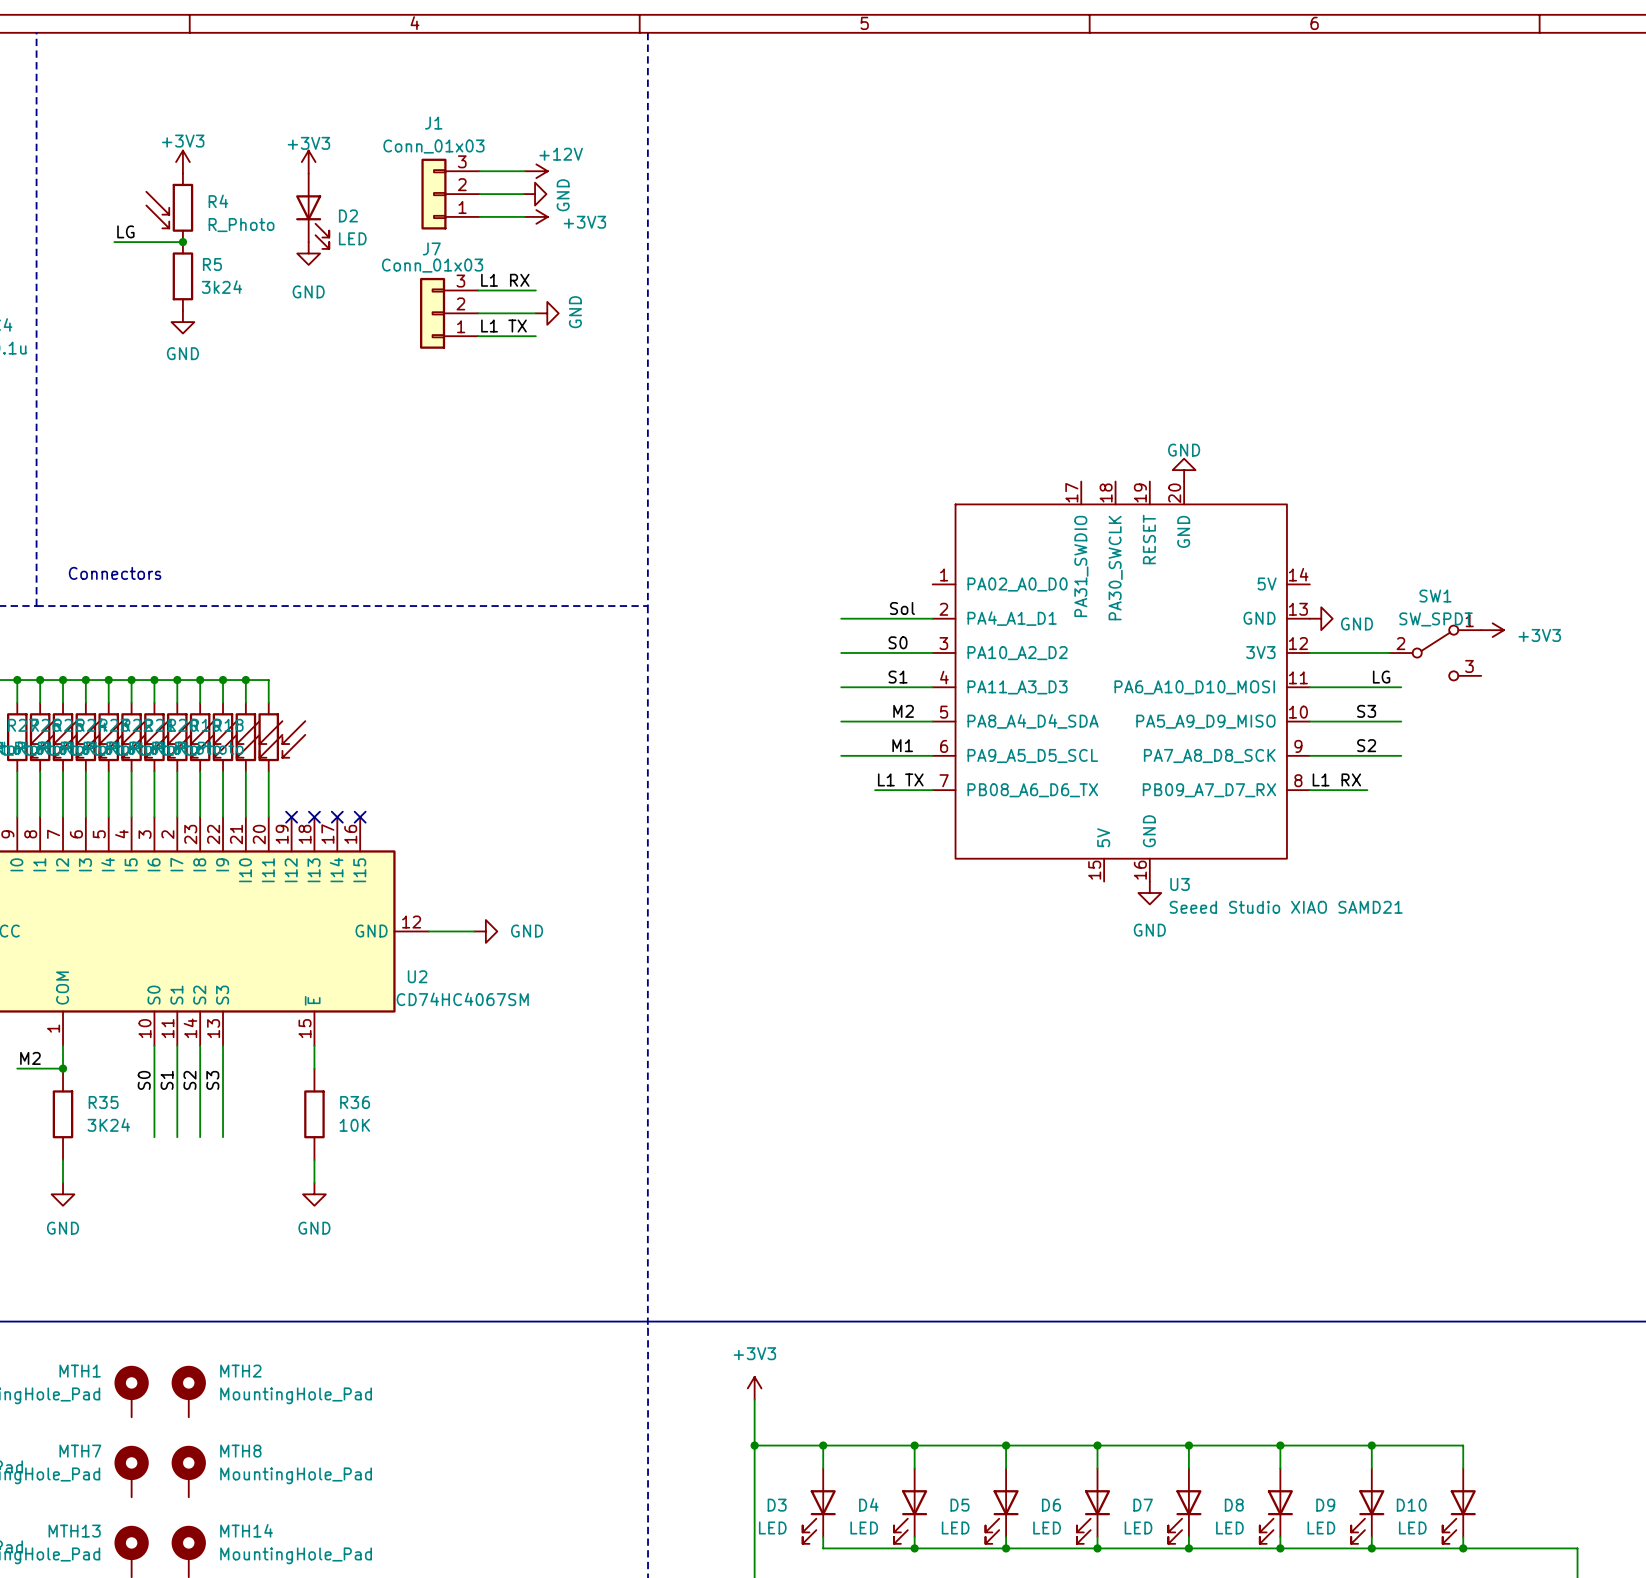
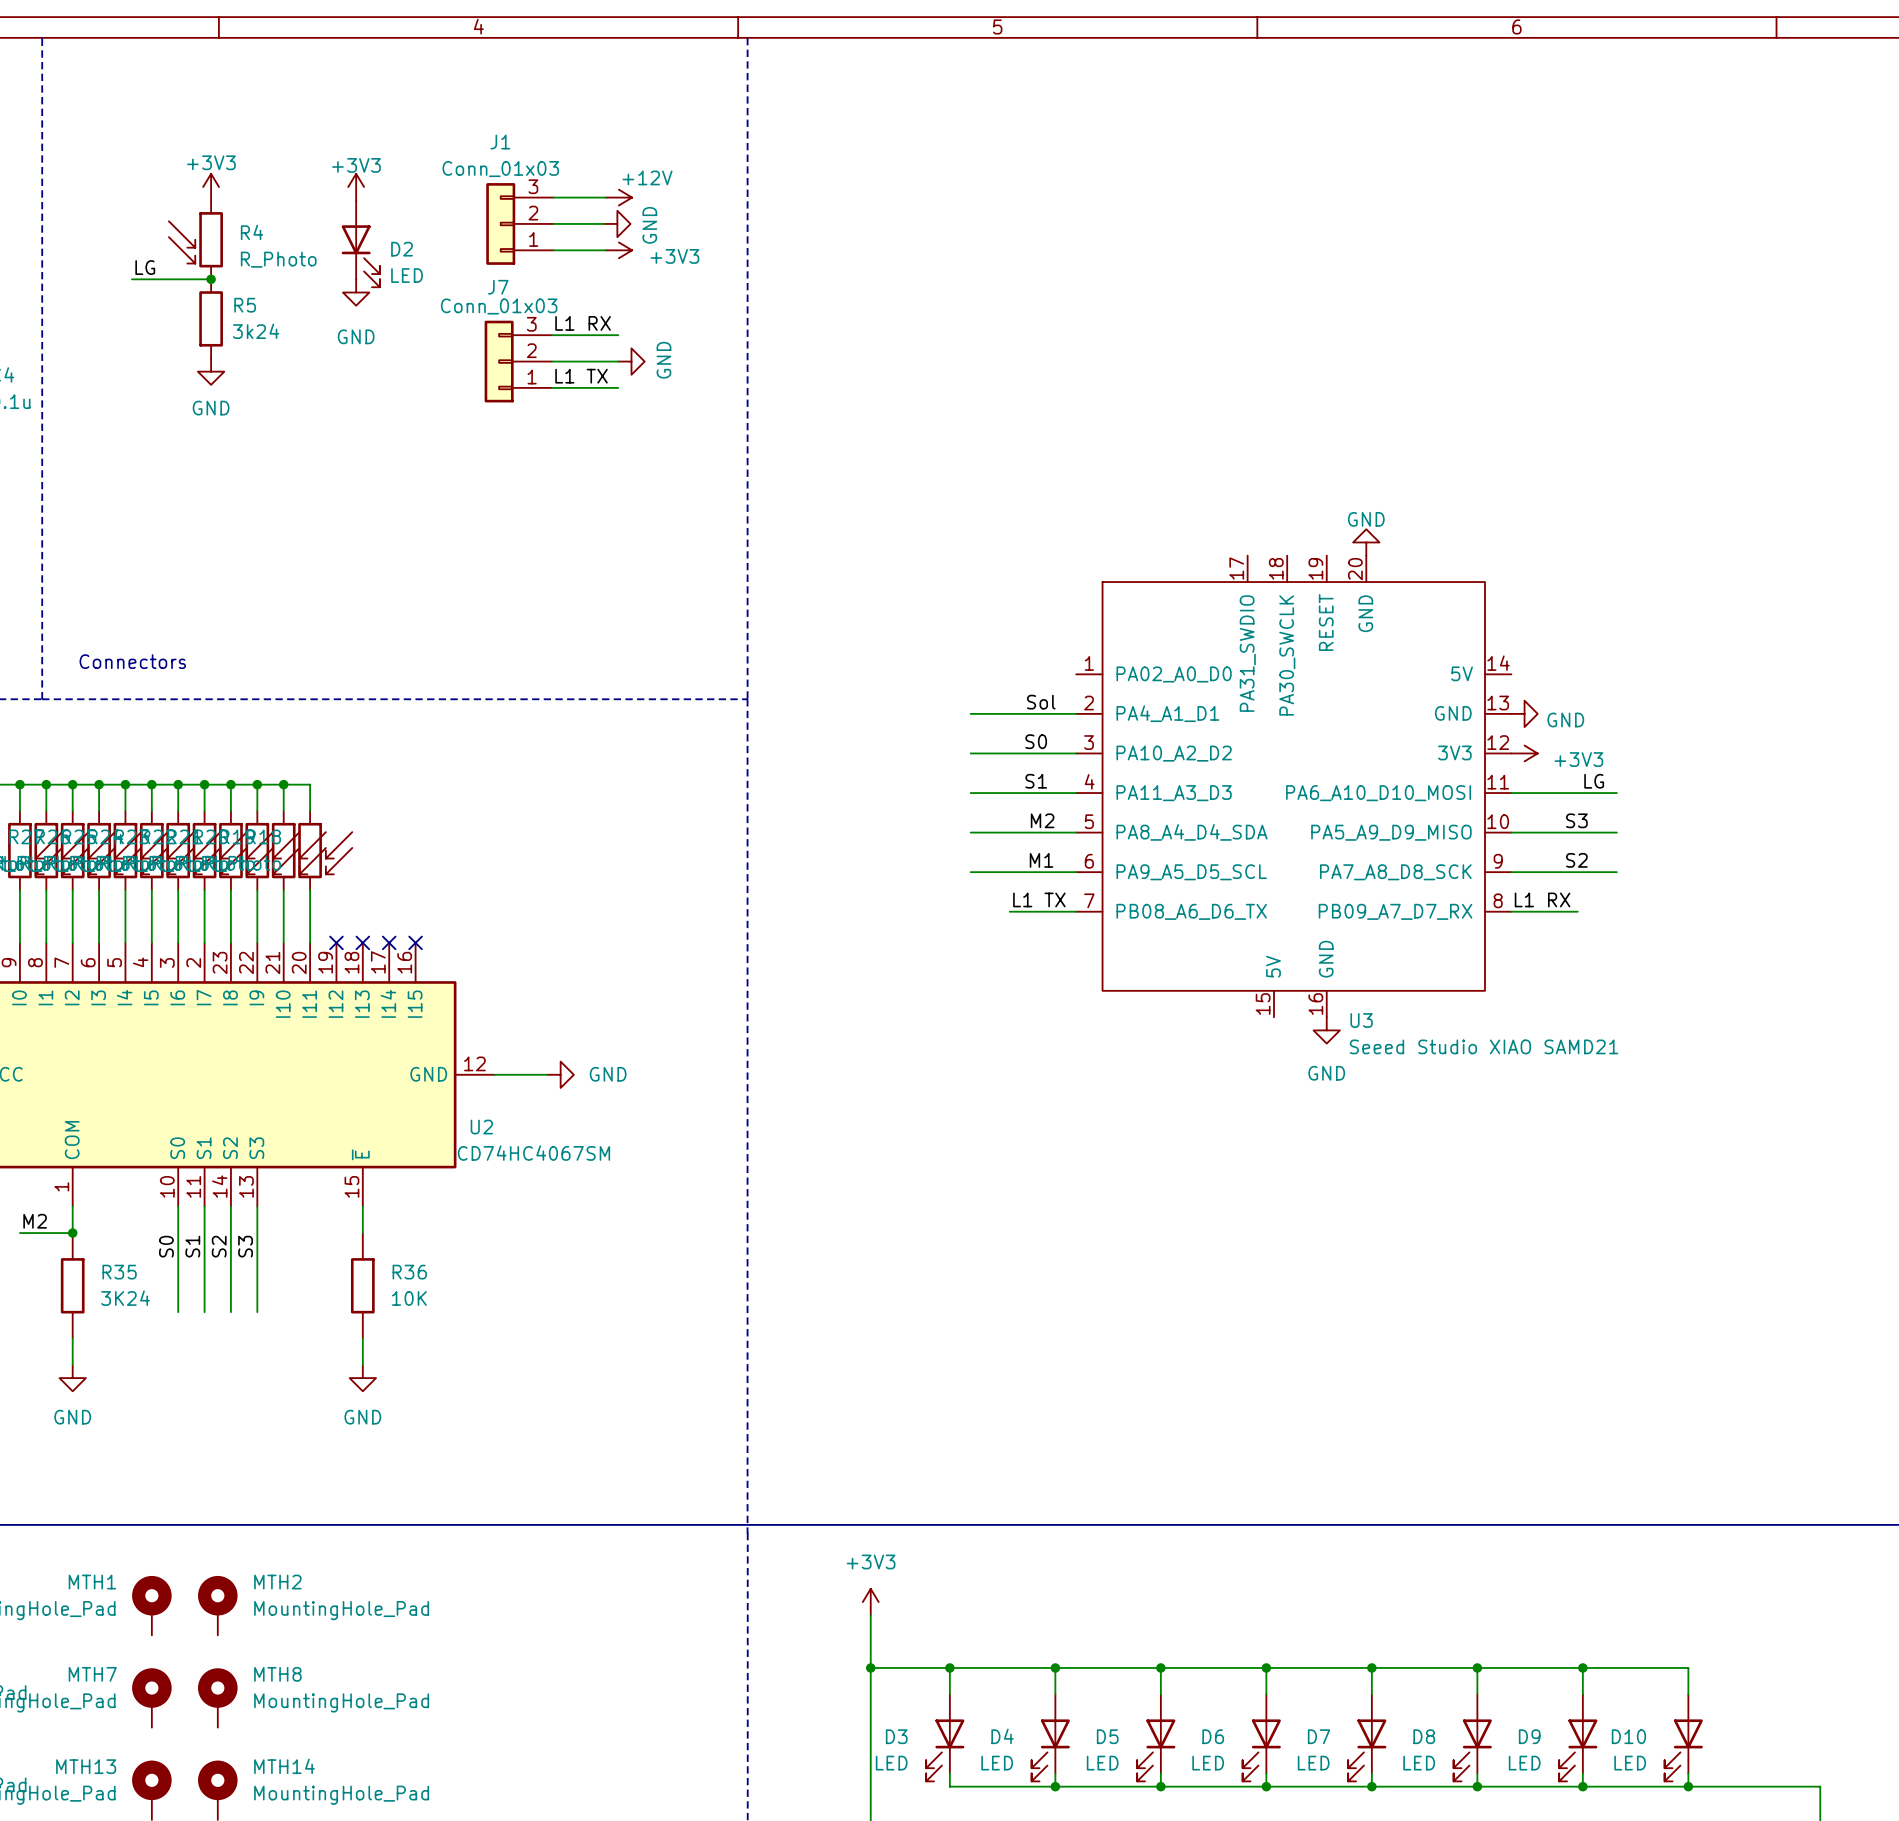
power symbol position: +3V3 (1492, 630) -> +3V3 (1524, 753)
wire: (1309, 652) (1389, 652) -> none
wire: (1389, 653) (1389, 653) -> none
SW1: SW_SPDT (1435, 653) -> none

